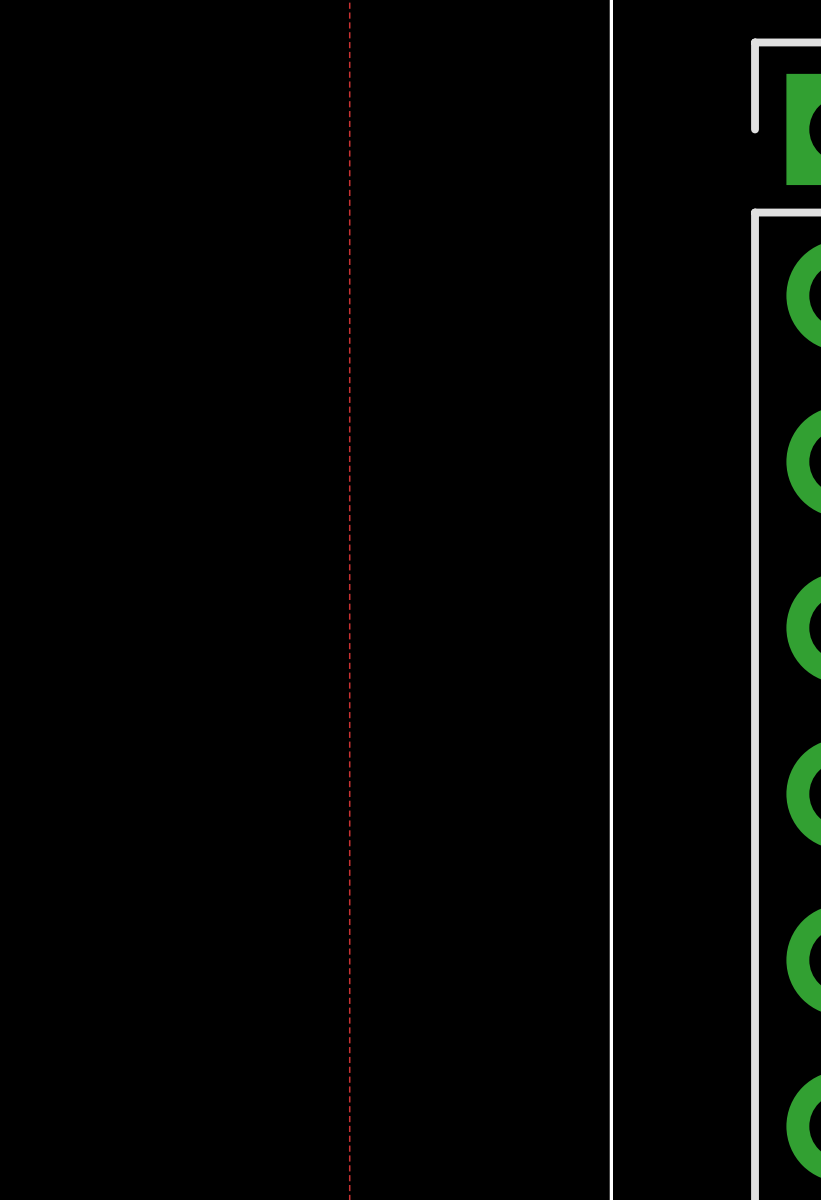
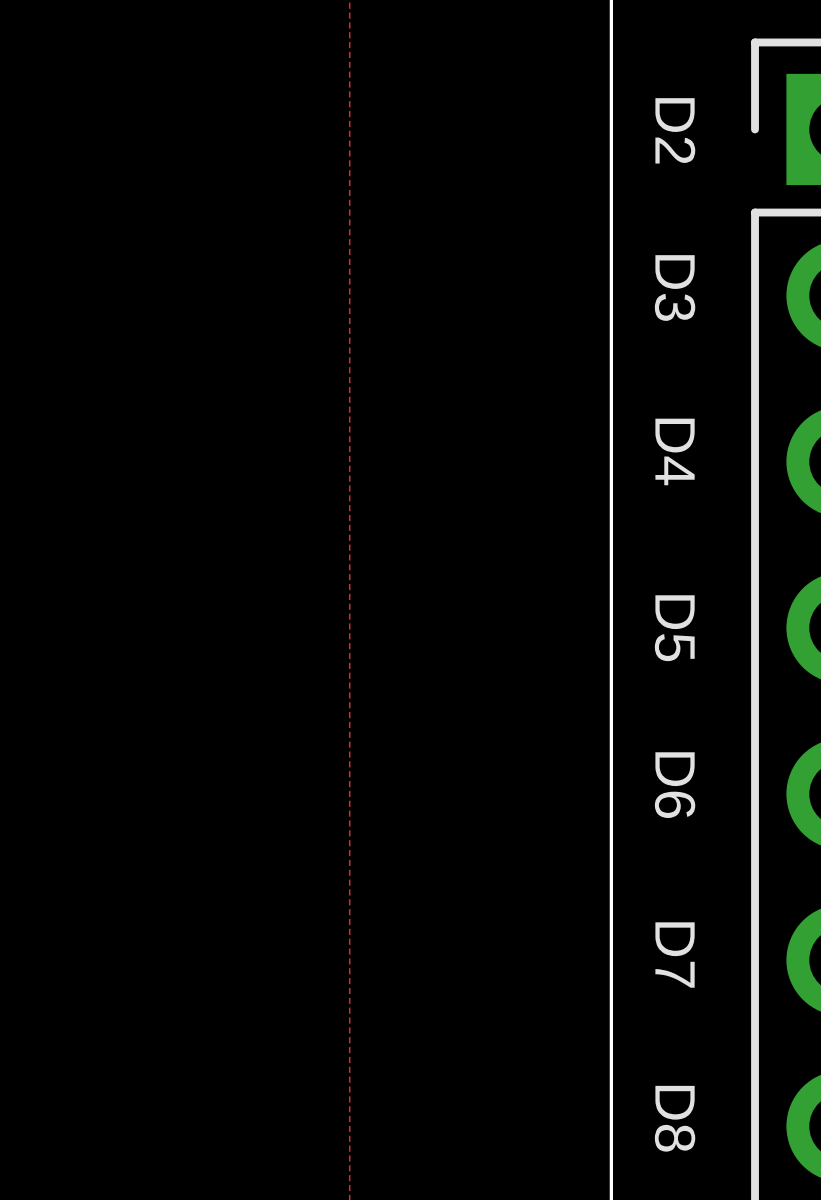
text: none -> D2 (675, 130)
text: none -> D3 (675, 288)
text: none -> D4 (675, 451)
text: none -> D5 (674, 628)
text: none -> D6 (675, 785)
text: none -> D7 (675, 955)
text: none -> D8 (675, 1118)

